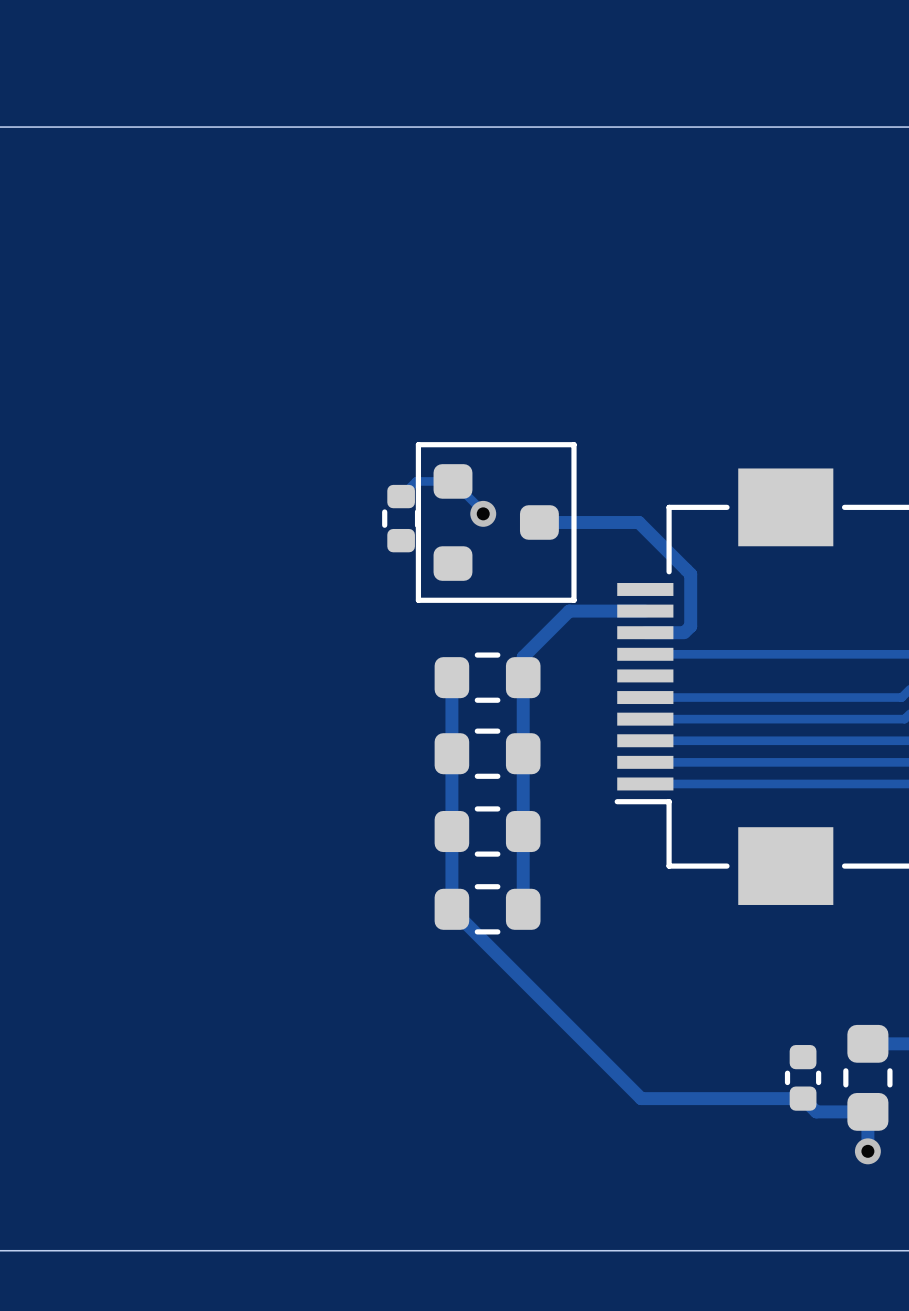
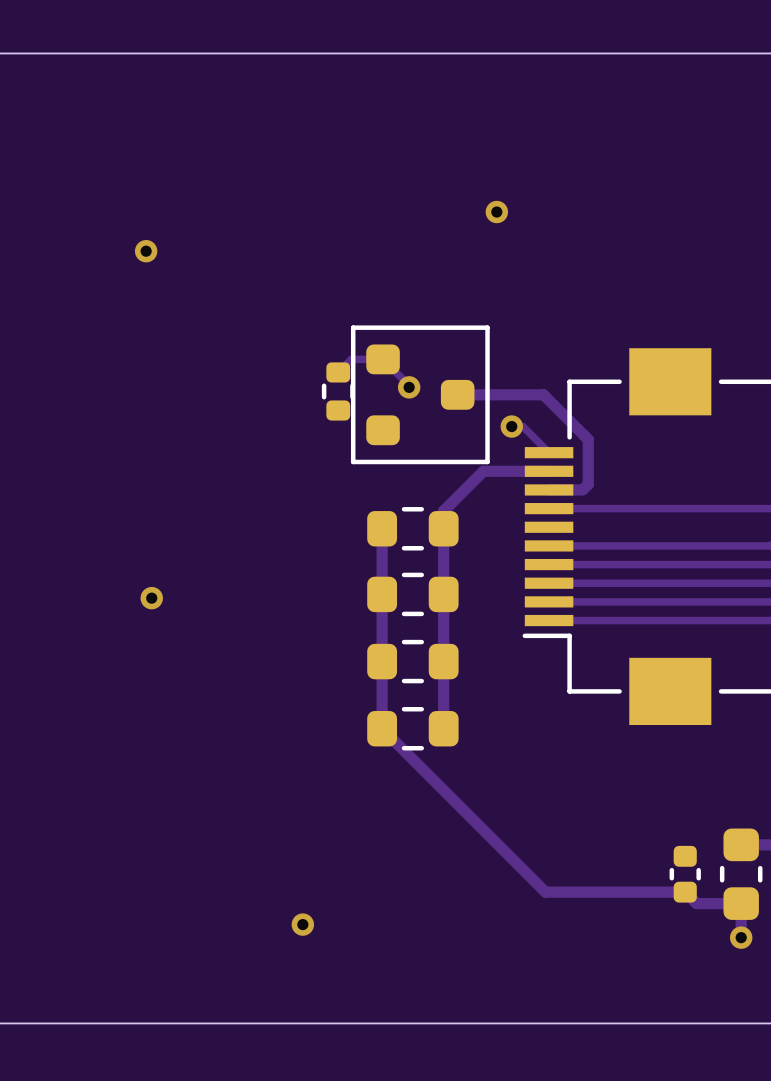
via: none -> (496, 212)
via: none -> (146, 251)
track: none -> (511, 426) (522, 426) (549, 452)
via: none -> (511, 426)
via: none -> (151, 598)
via: none -> (302, 924)

